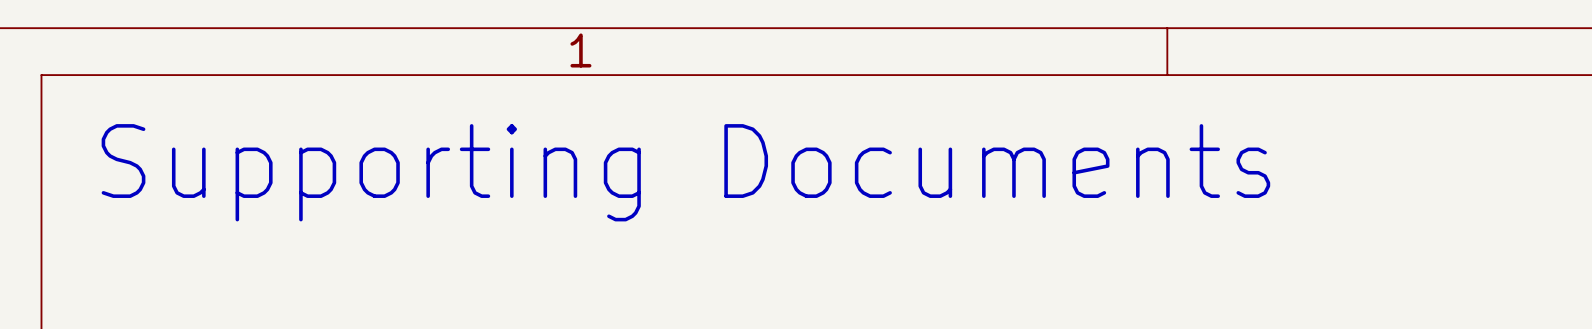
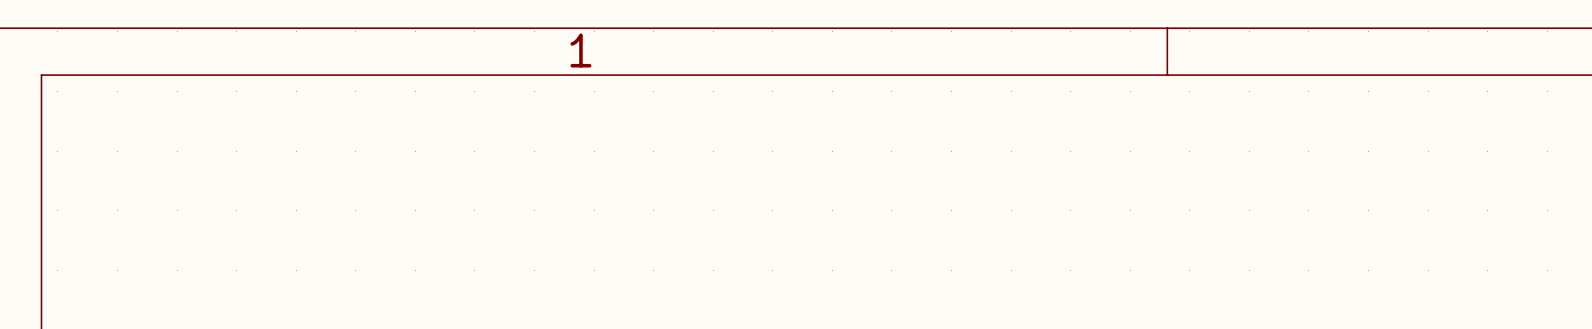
text: Supporting Documents (685, 172) -> none

